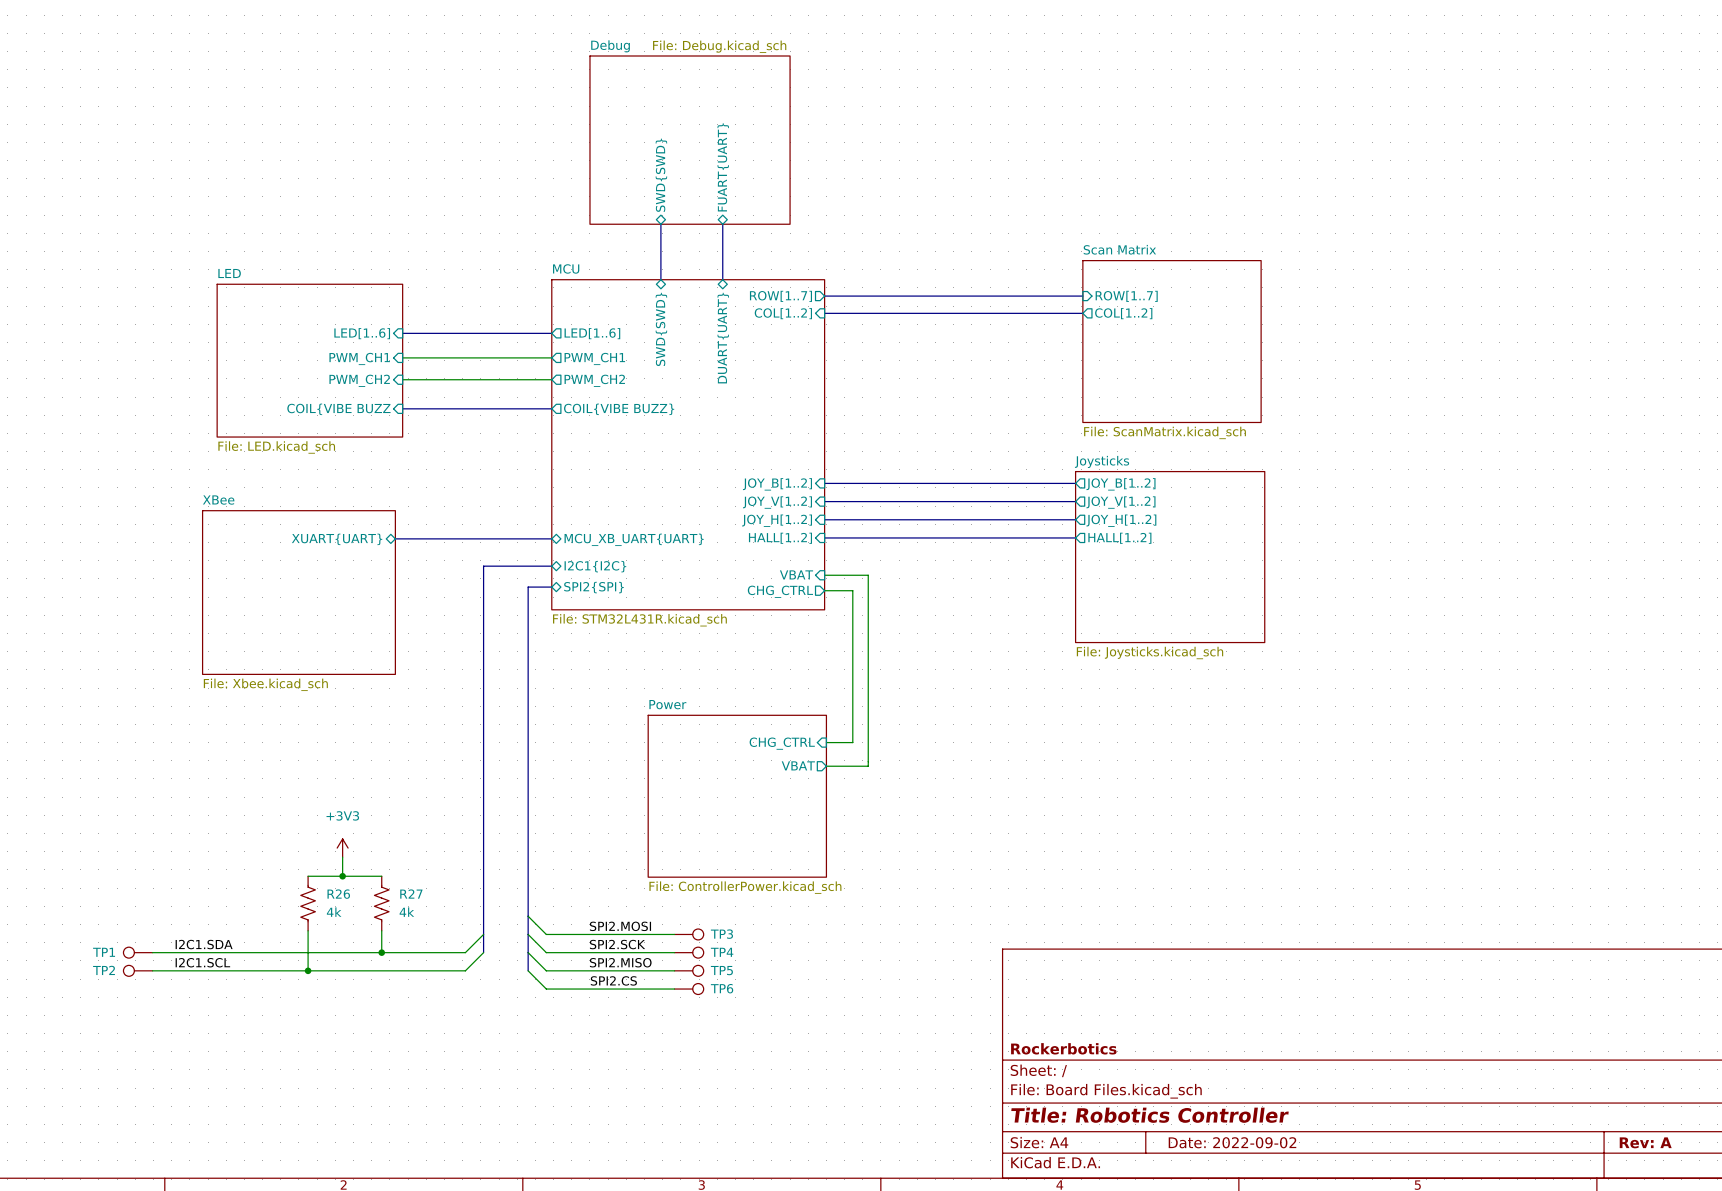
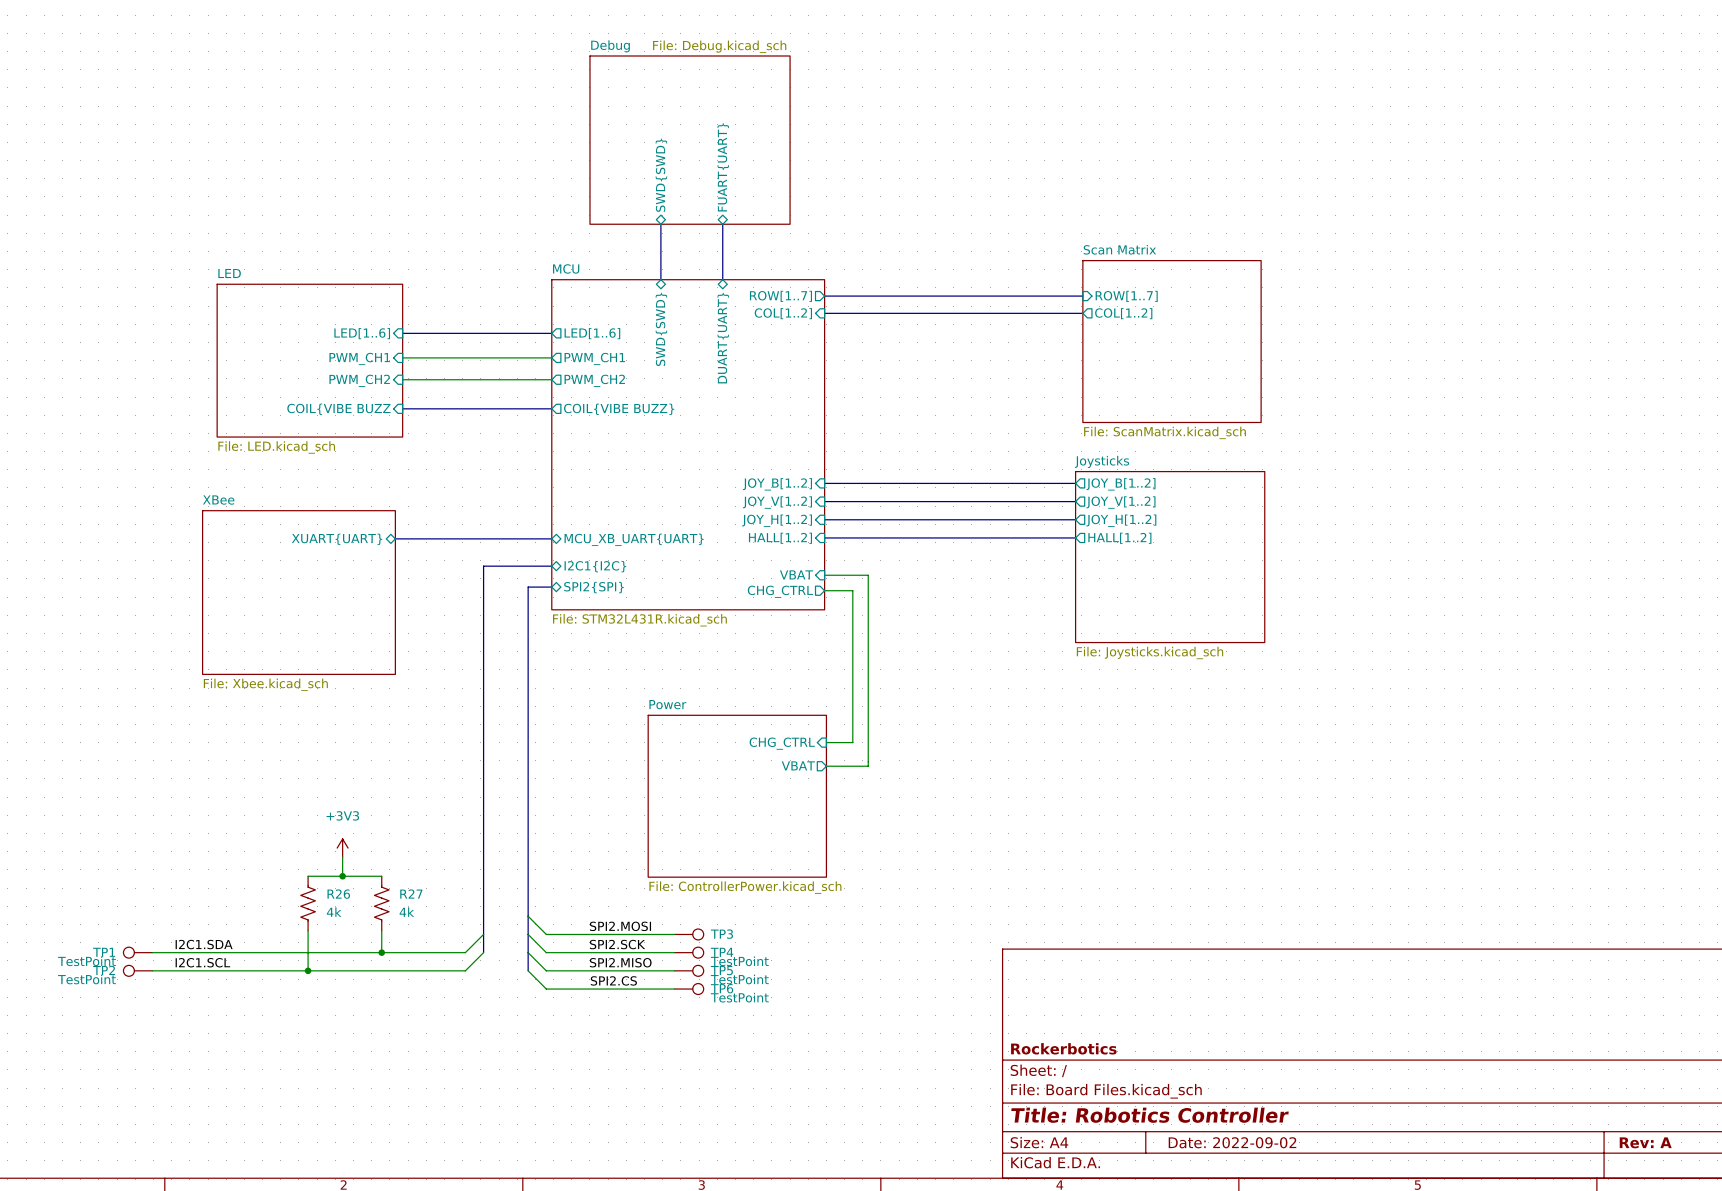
TP1 value: none -> TestPoint (86, 961)
TP4 value: none -> TestPoint (739, 961)
TP2 value: none -> TestPoint (86, 979)
TP5 value: none -> TestPoint (739, 979)
TP6 value: none -> TestPoint (739, 997)

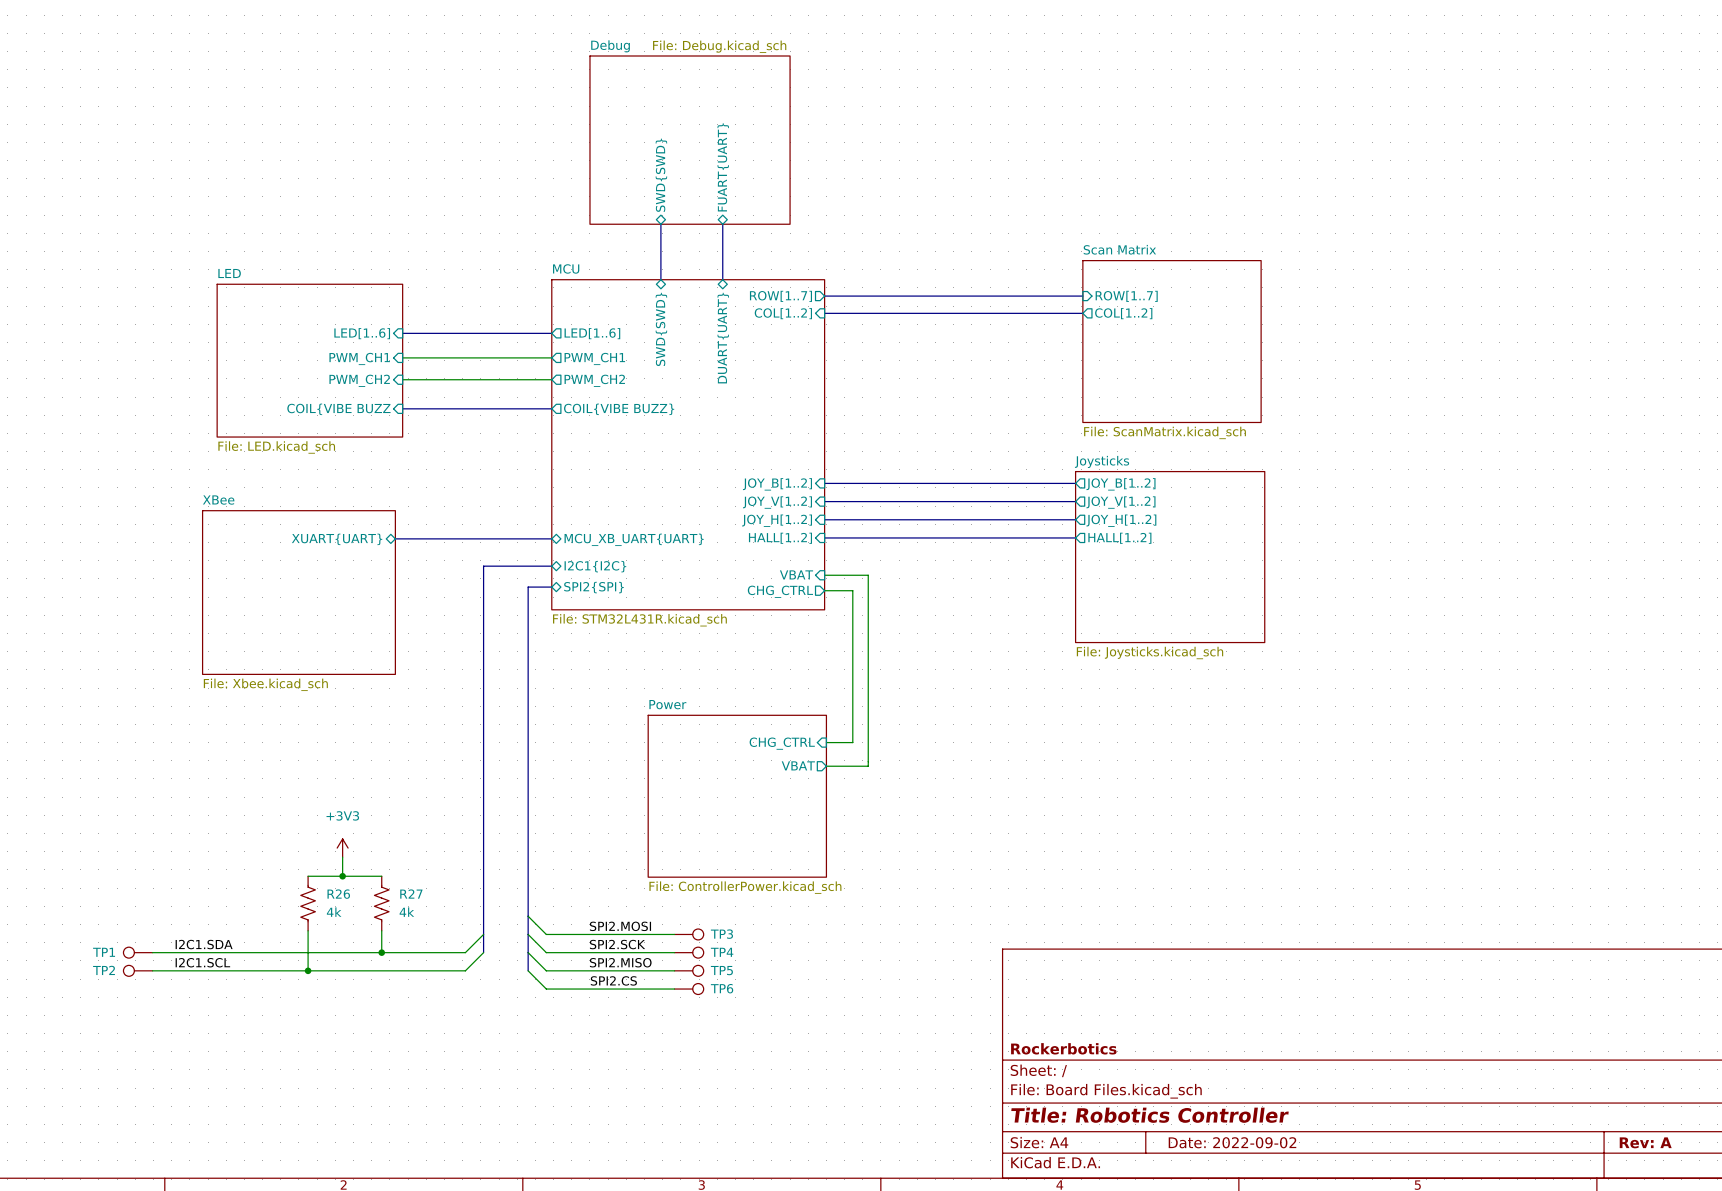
TP1 value: TestPoint (86, 961) -> none
TP4 value: TestPoint (739, 961) -> none
TP2 value: TestPoint (86, 979) -> none
TP5 value: TestPoint (739, 979) -> none
TP6 value: TestPoint (739, 997) -> none

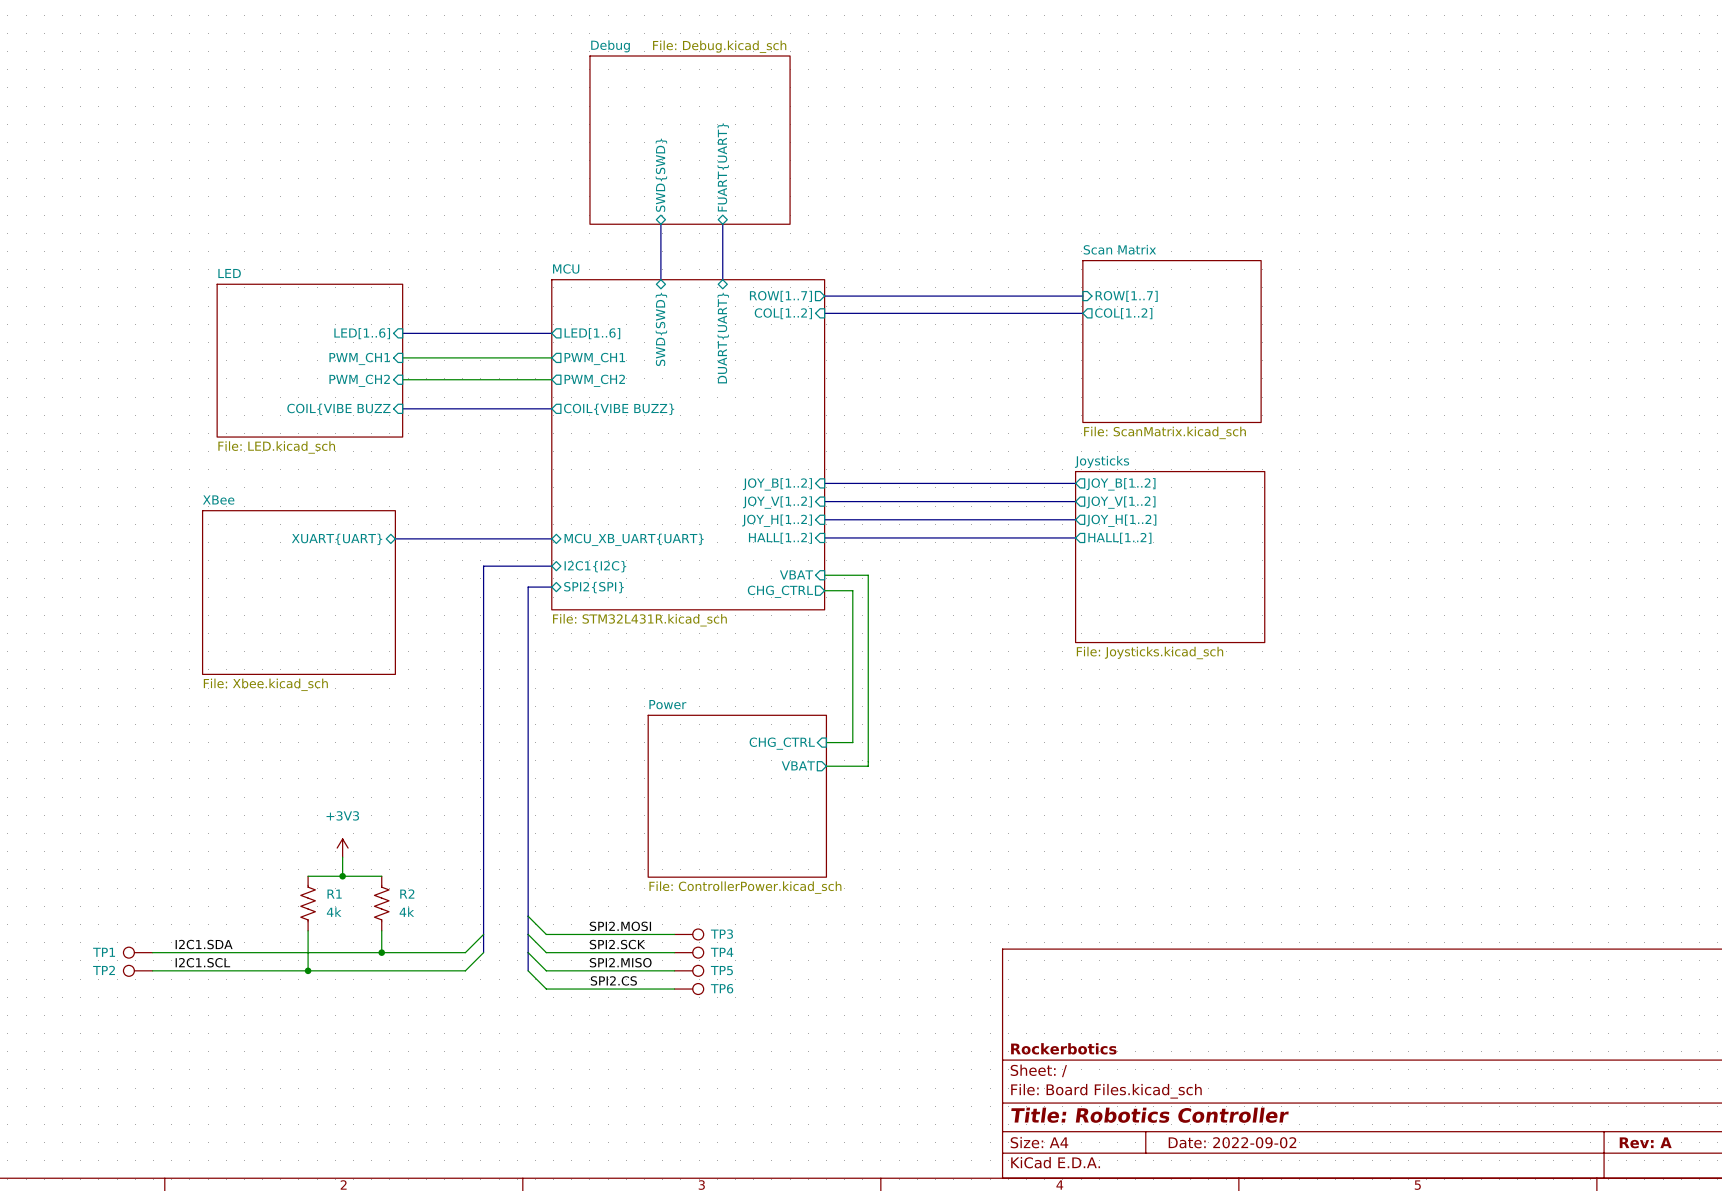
R26 name: R26 (338, 894) -> R1 (334, 894)
R27 name: R27 (411, 894) -> R2 (407, 894)

